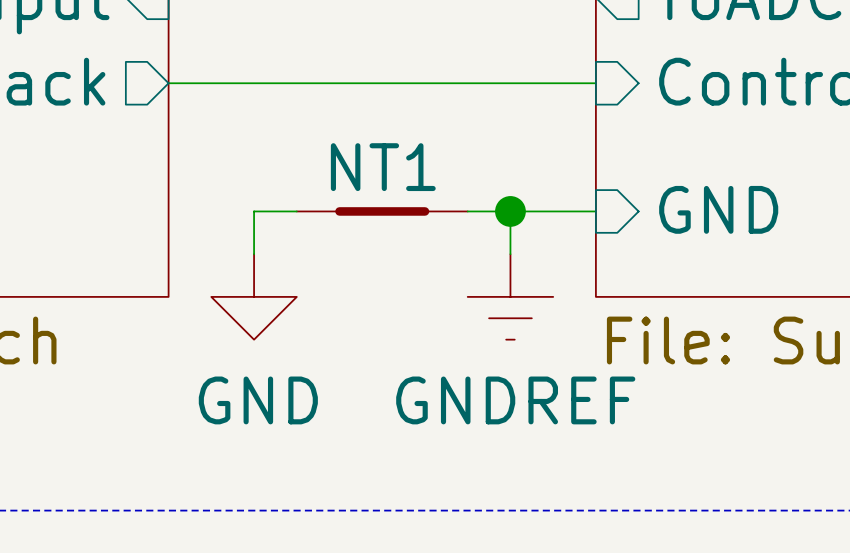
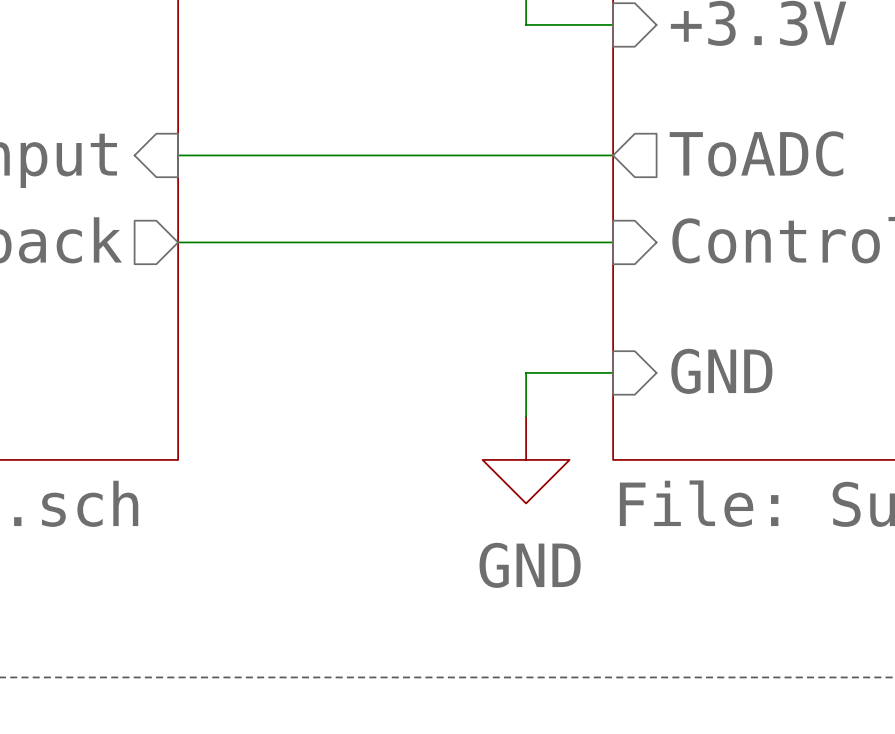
wire: (296, 211) (254, 211) (254, 254) -> none
NT1: (382, 211) -> none
wire: (467, 211) (510, 211) -> none
junction: (510, 211) -> none
power symbol: GND (254, 296) -> none
power symbol: GNDREF (510, 296) -> GND (526, 459)

